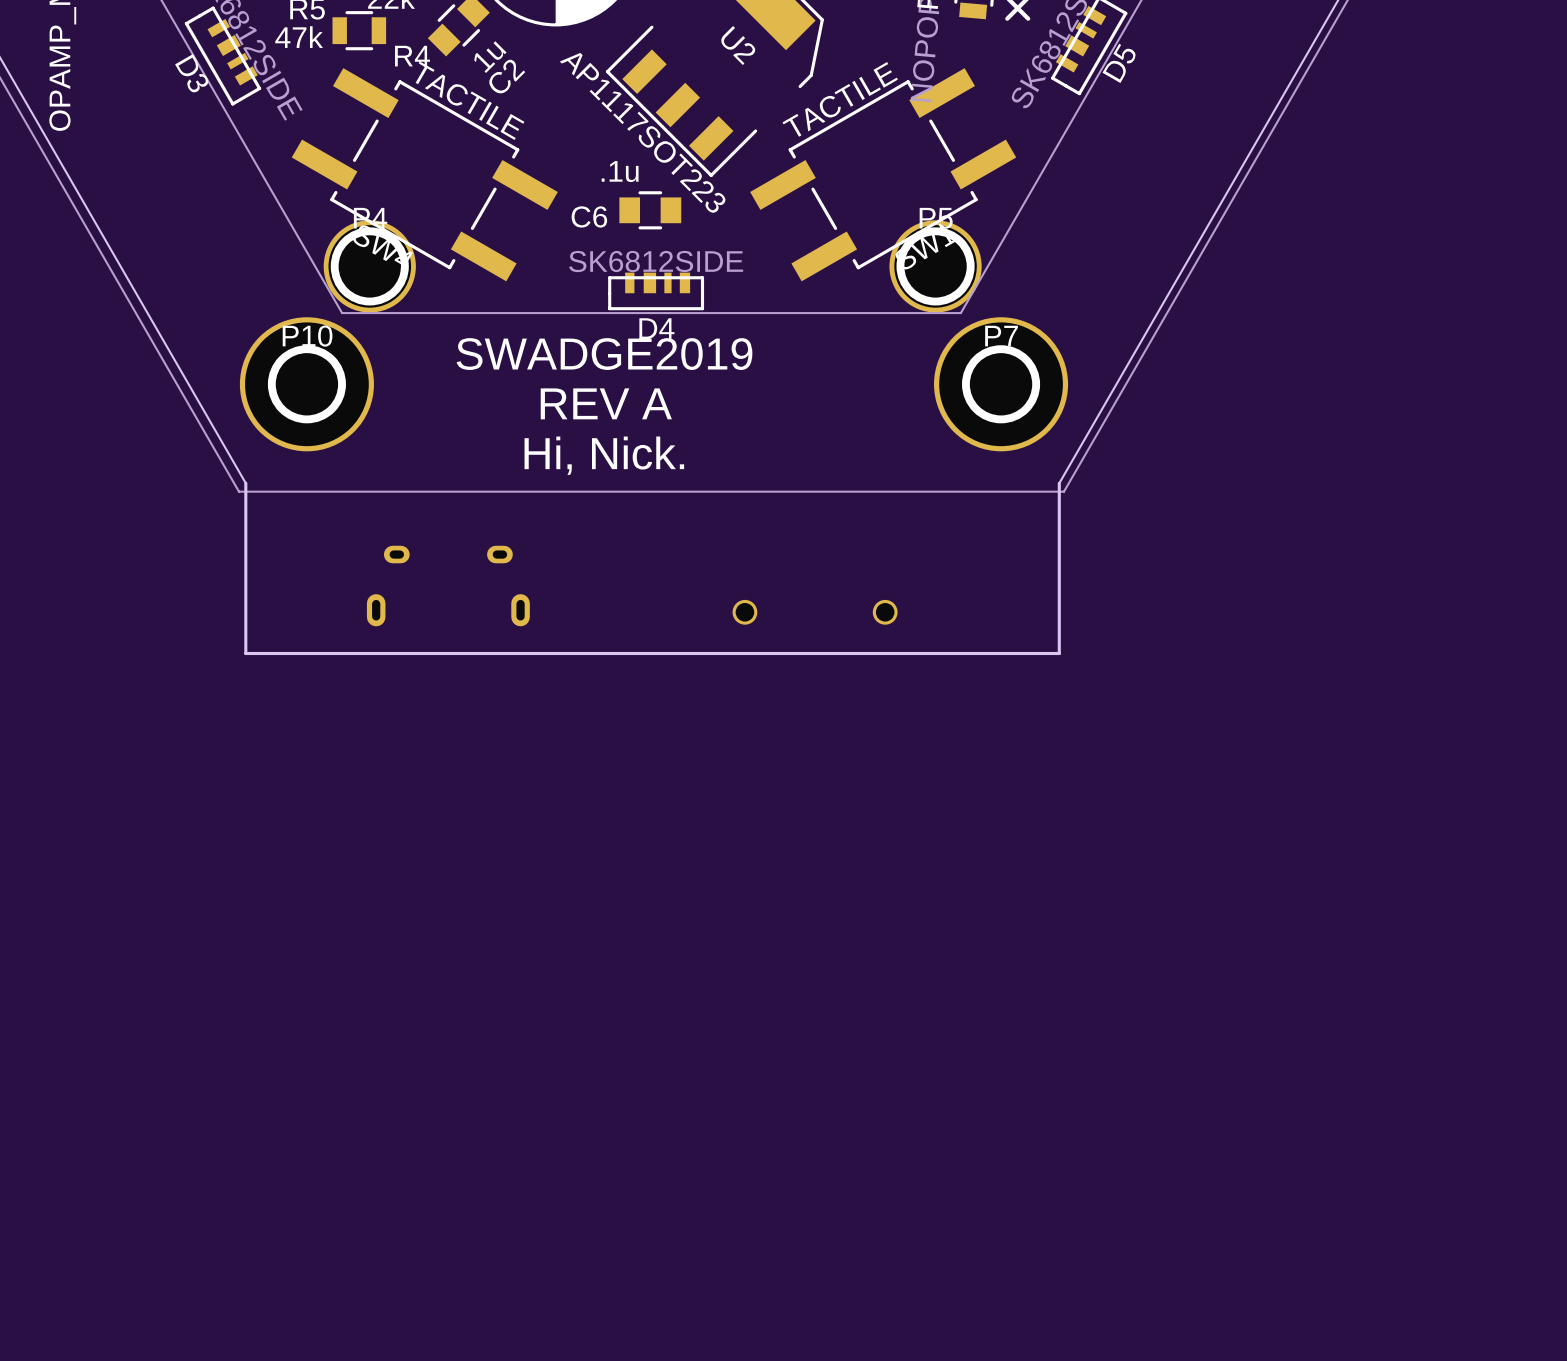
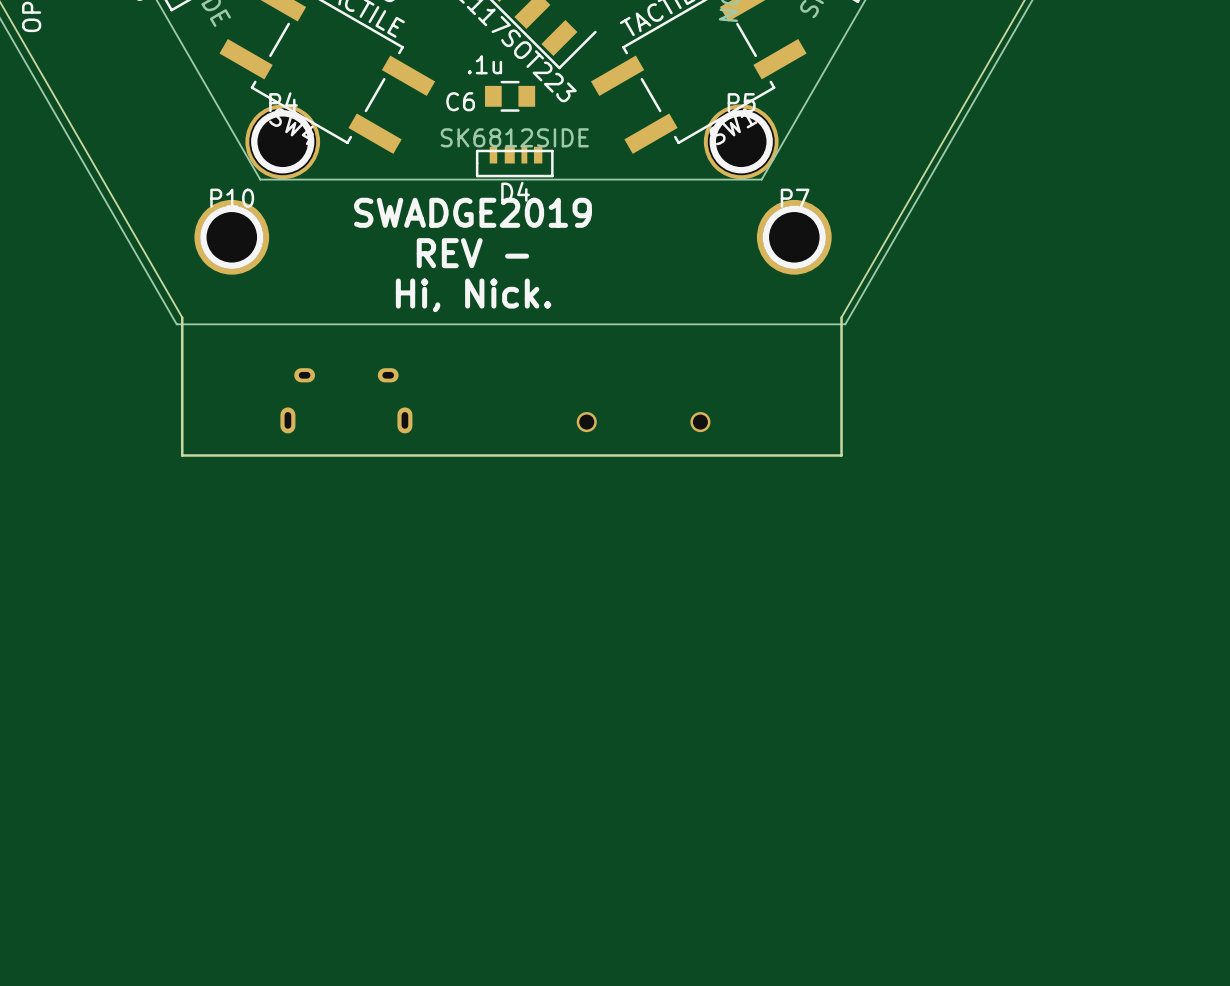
P10 footprint: [239, 317, 374, 452] -> [194, 199, 270, 275]
P7 footprint: [934, 317, 1069, 452] -> [756, 199, 832, 275]
text: REV A (606, 403) -> REV - (472, 253)

